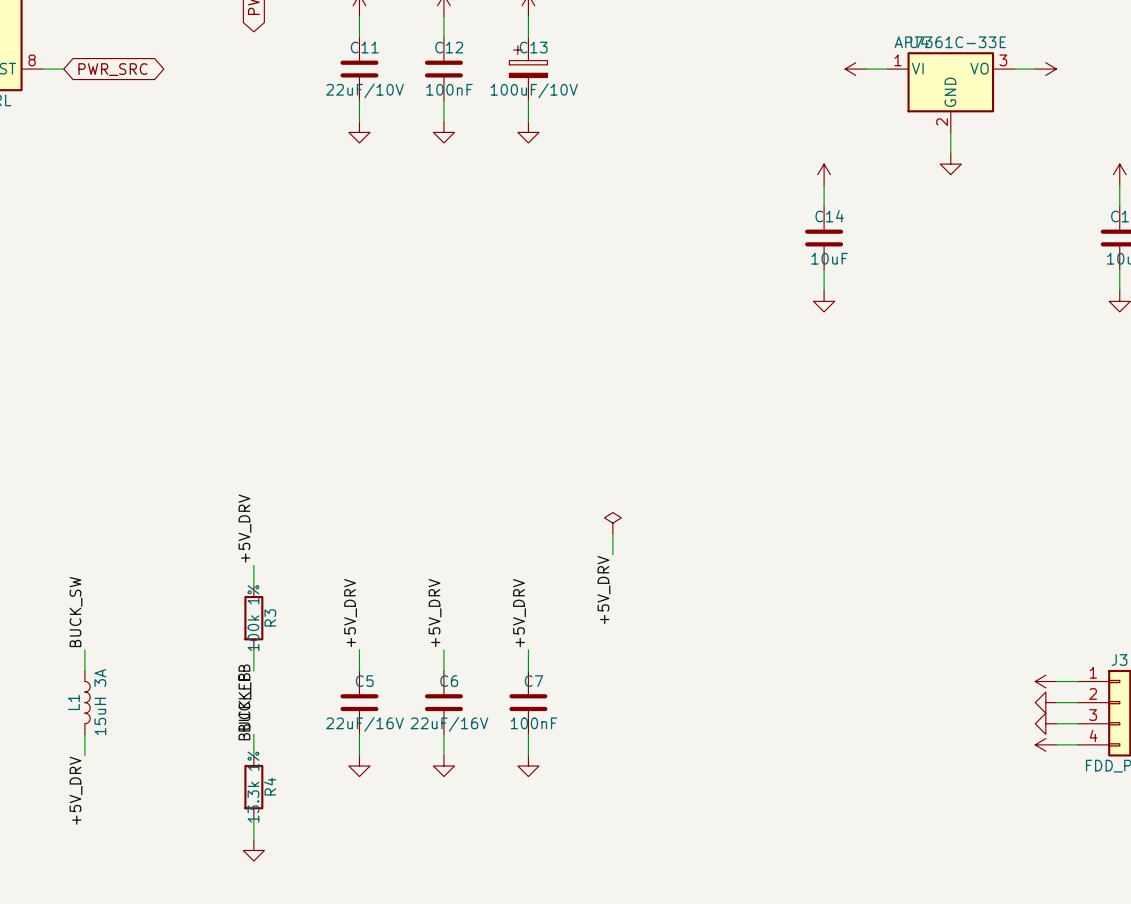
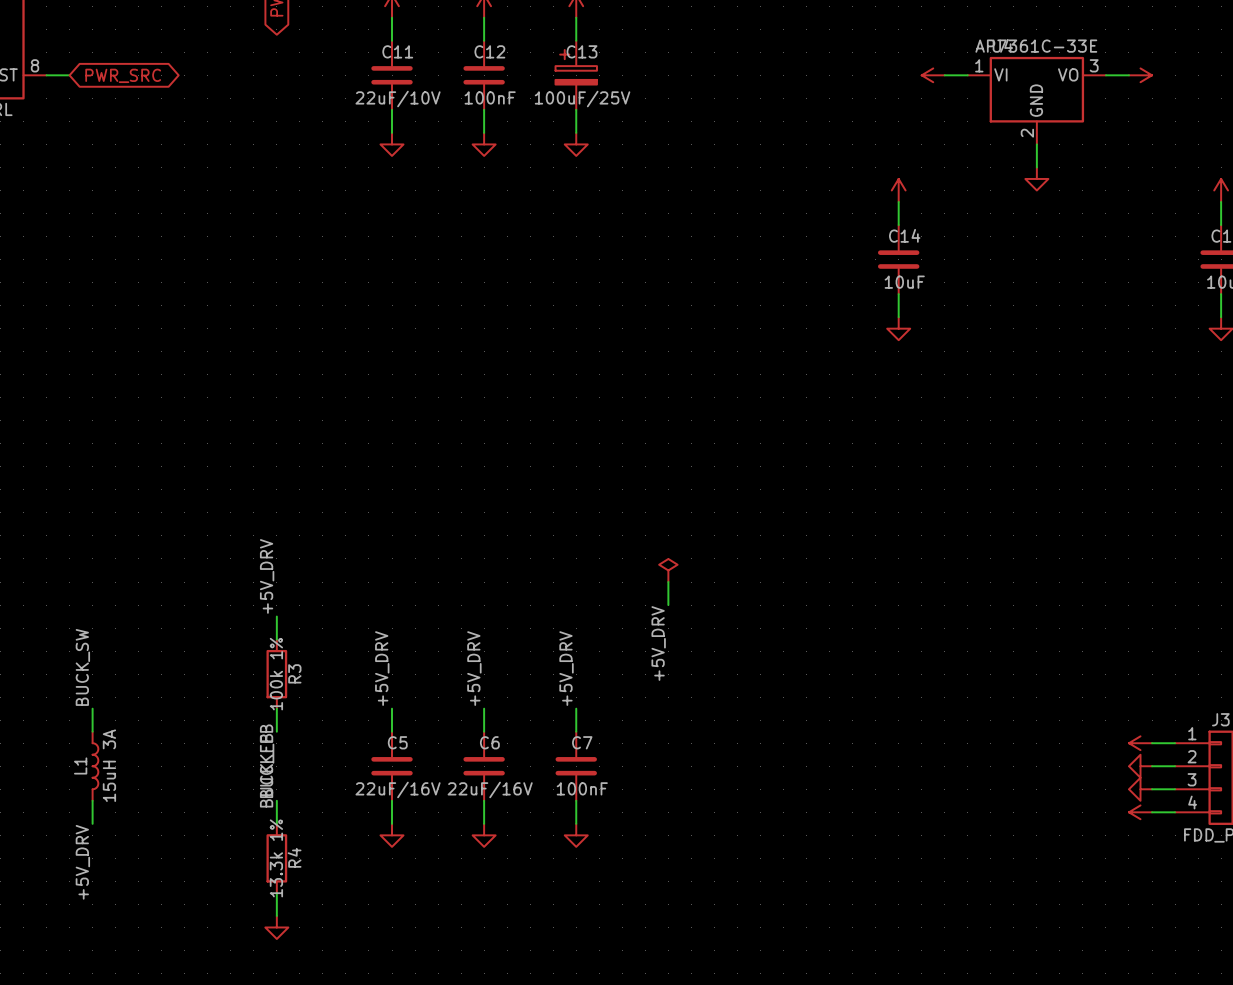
C13 value: 100uF/10V (534, 90) -> 100uF/25V (582, 99)

